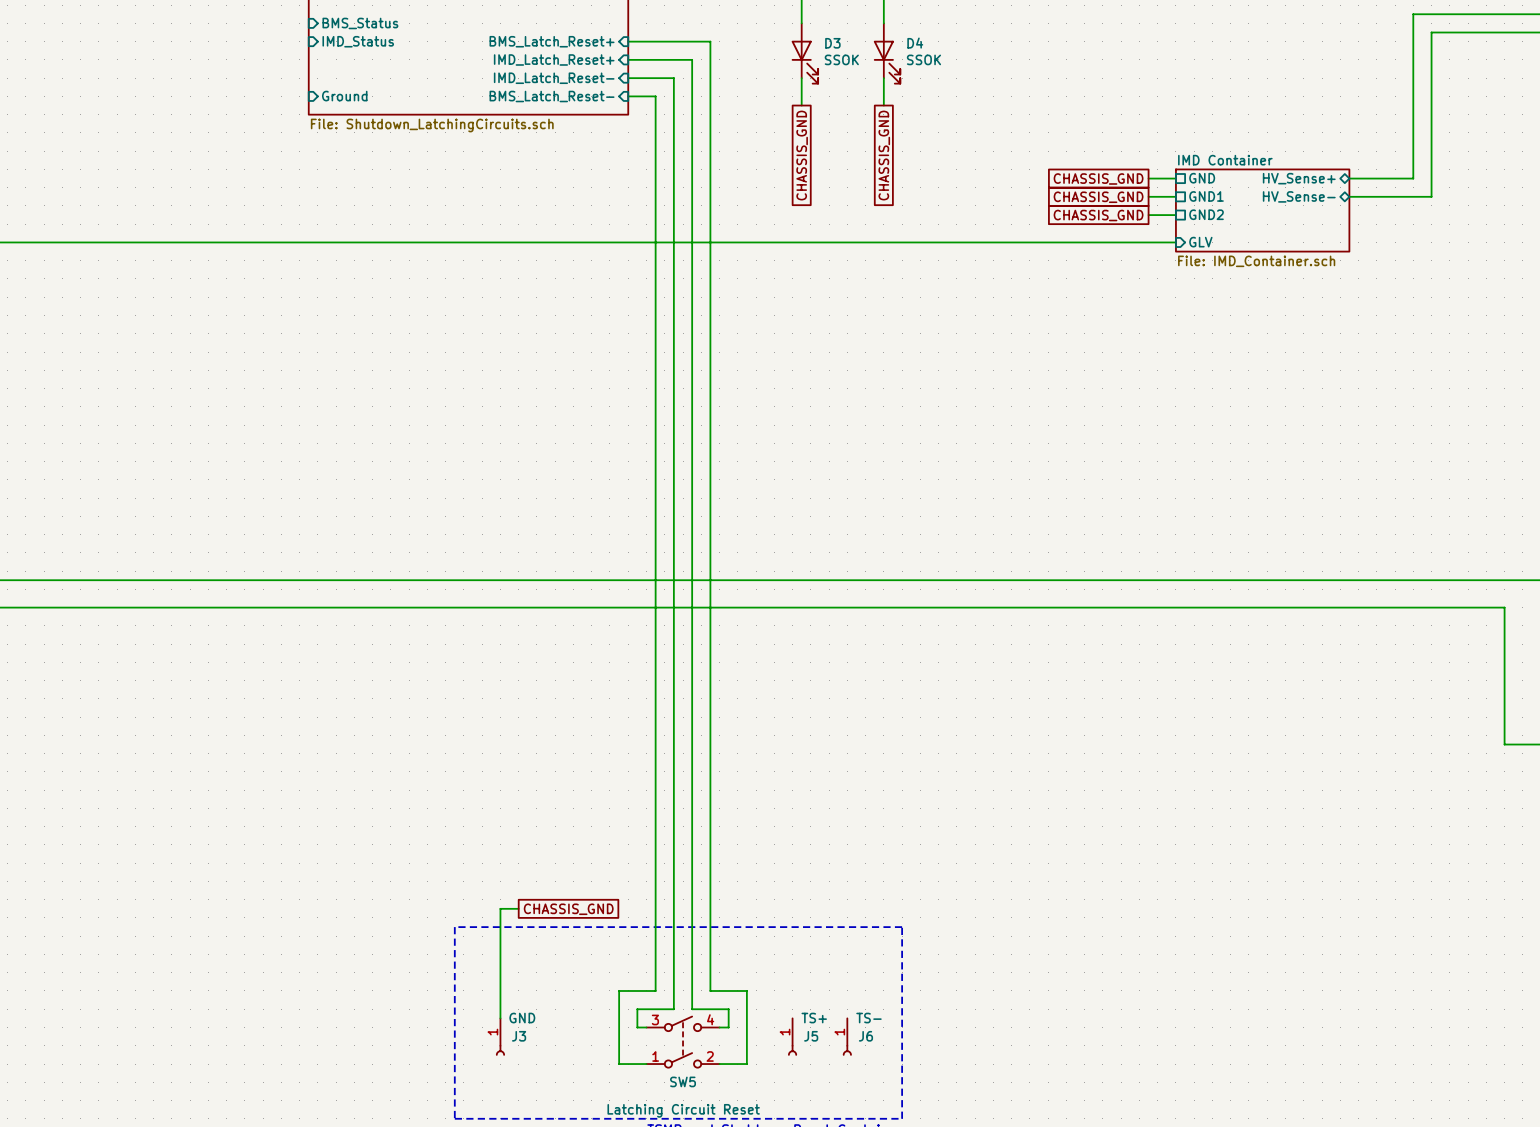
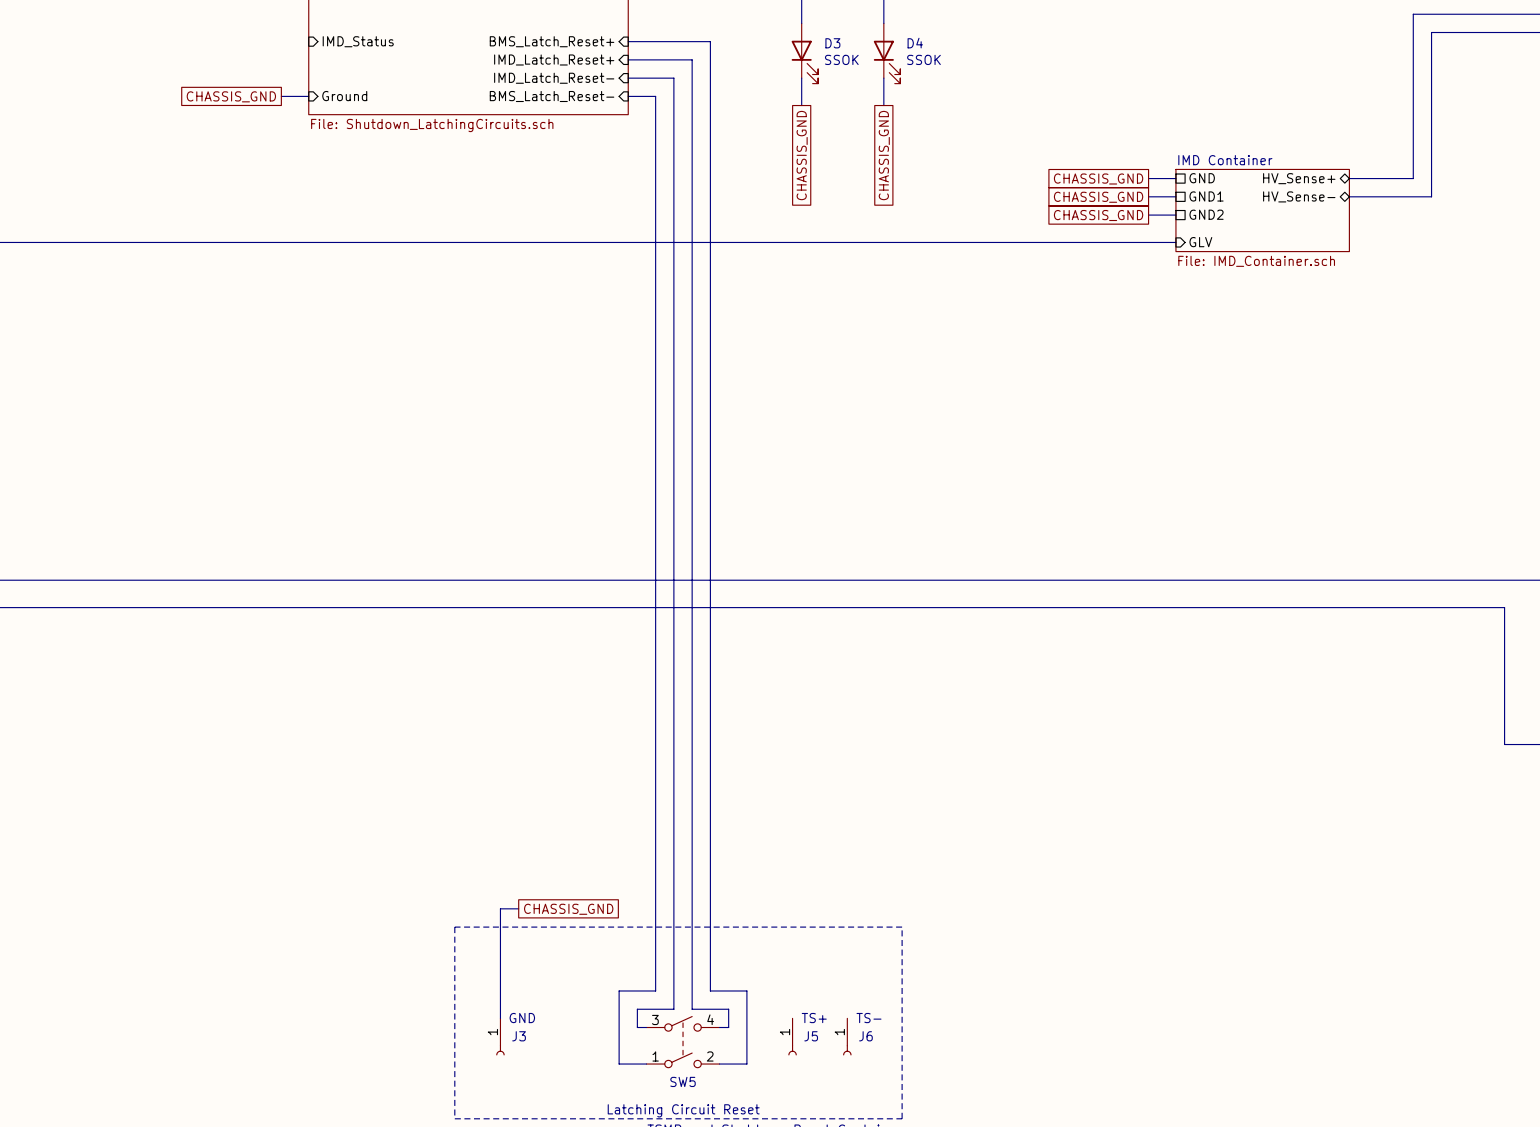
sheet pin: BMS_Status (360, 23) -> none
global label: none -> CHASSIS_GND (231, 96)
wire: none -> (281, 96) (308, 96)

